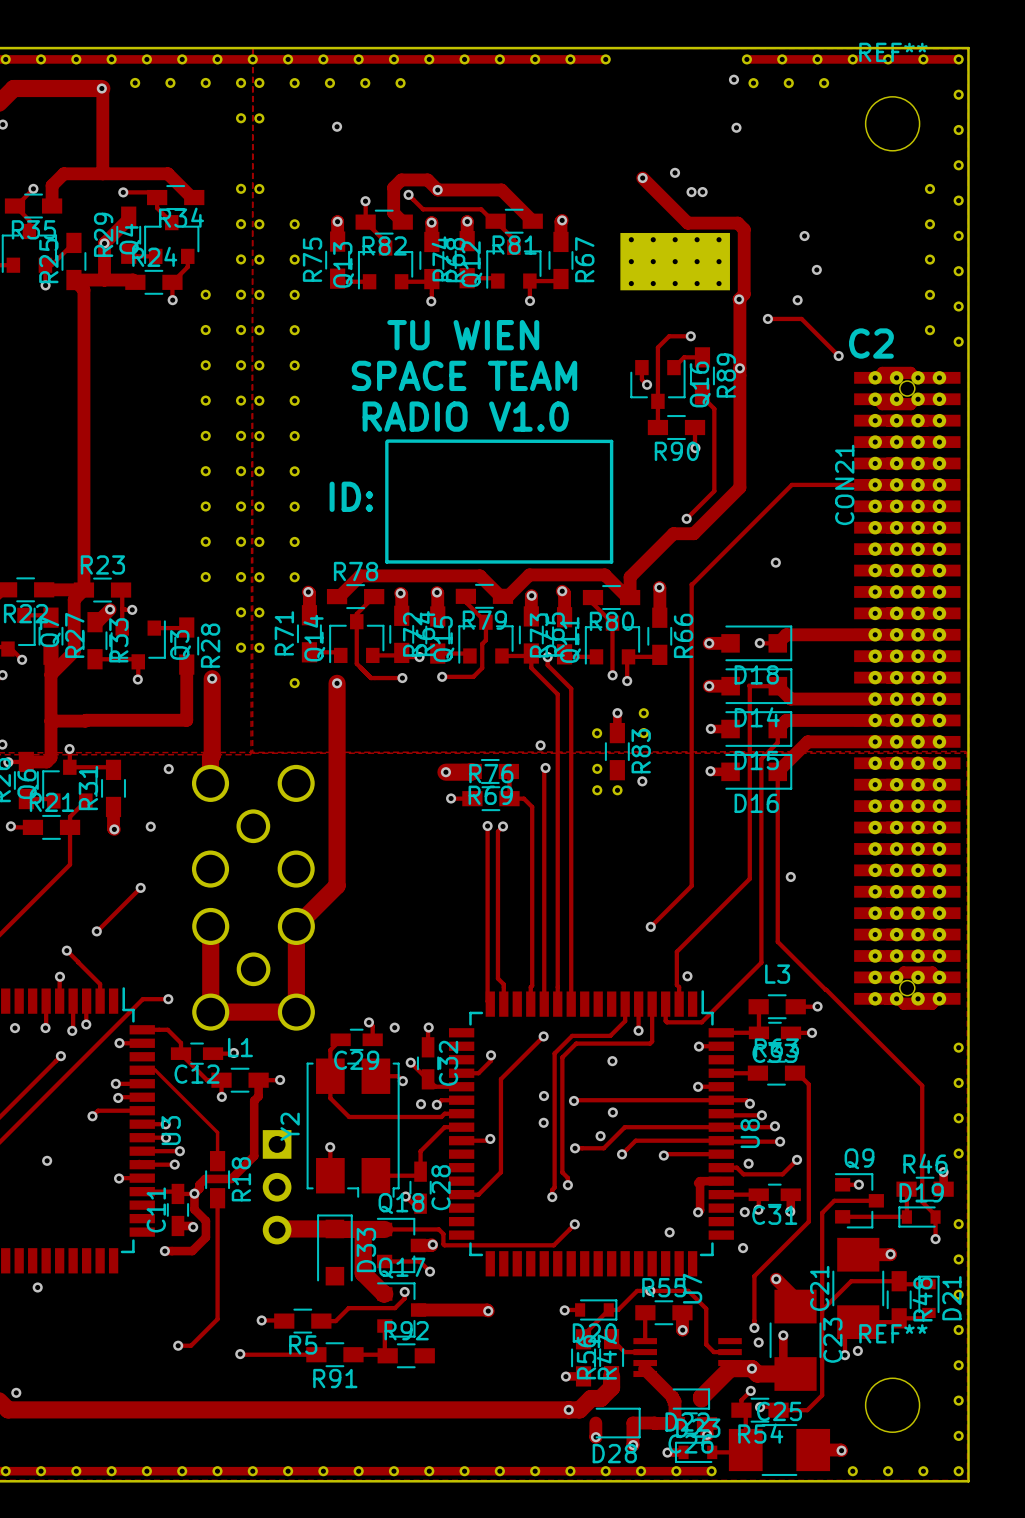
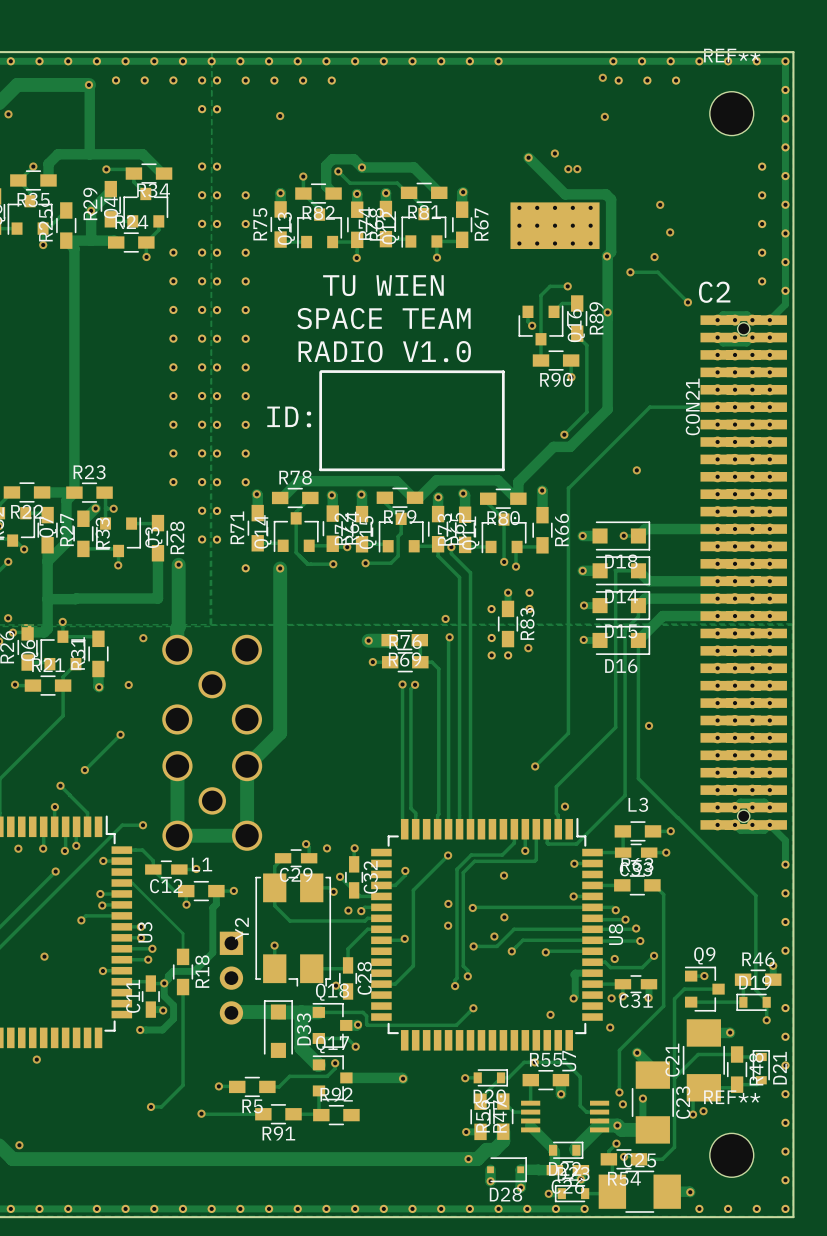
track: none -> (498, 61) (613, 61)
track: none -> (785, 61) (785, 304) (769, 320)
track: none -> (769, 824) (785, 840) (785, 864)

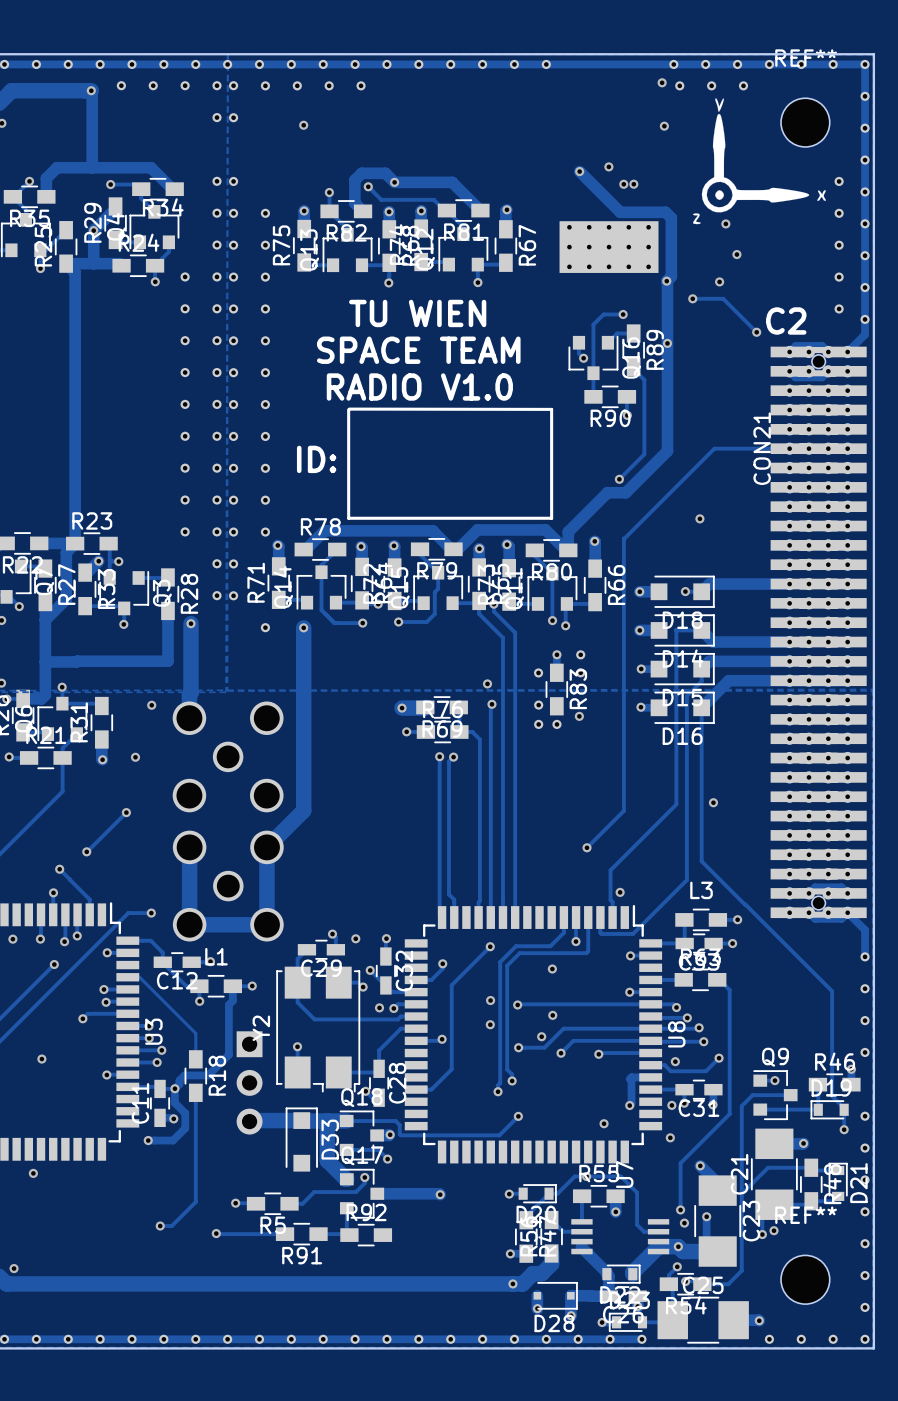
drawing: none -> [692, 98, 826, 225]

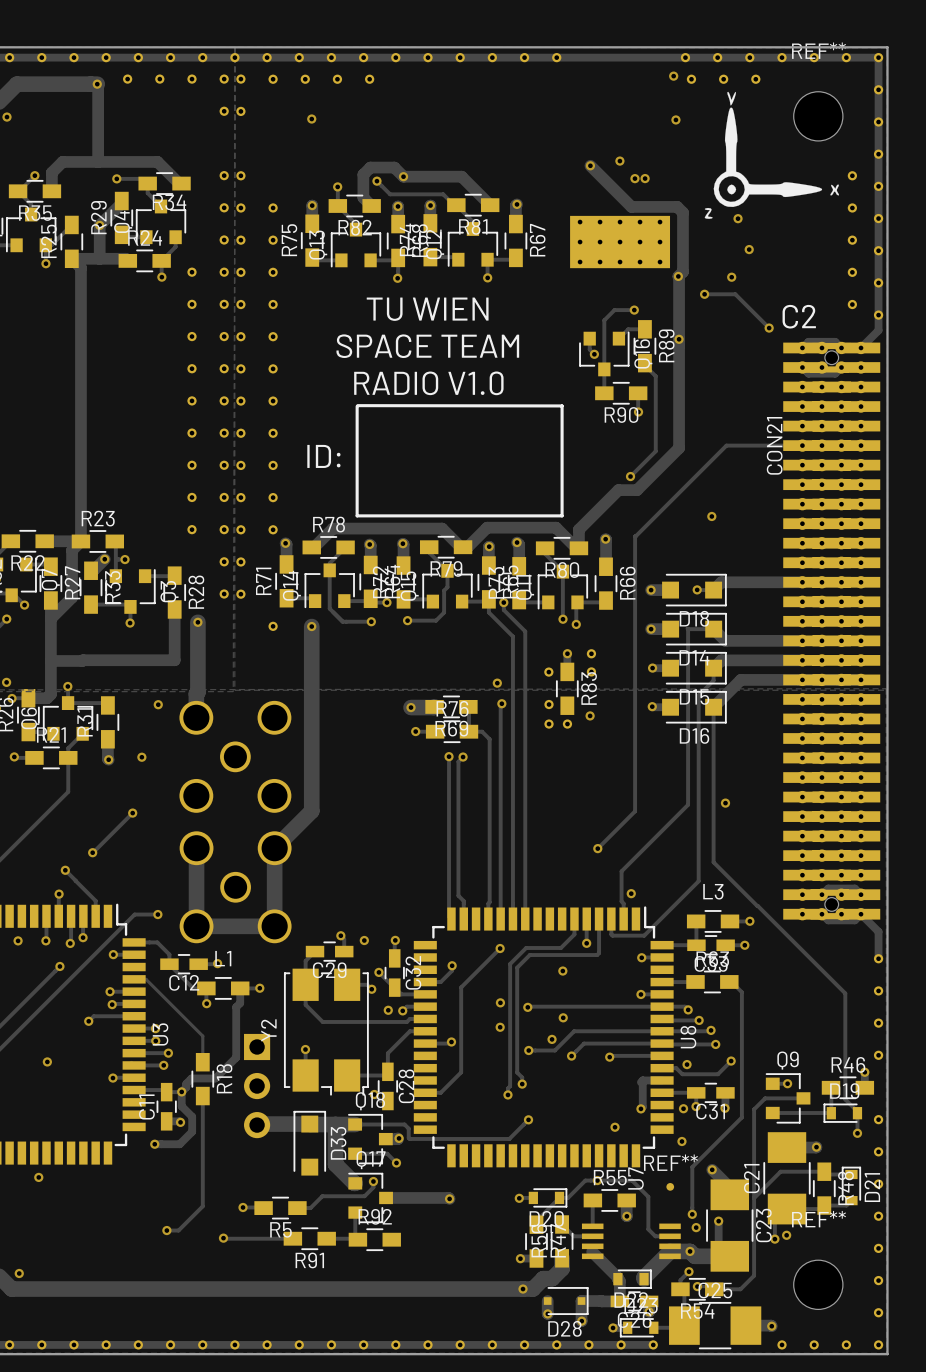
REF**: none -> (670, 1186)

